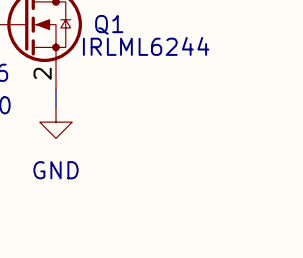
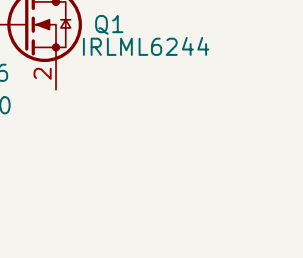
wire: (56, 89) (56, 105) -> none
power symbol: GND (56, 122) -> none

